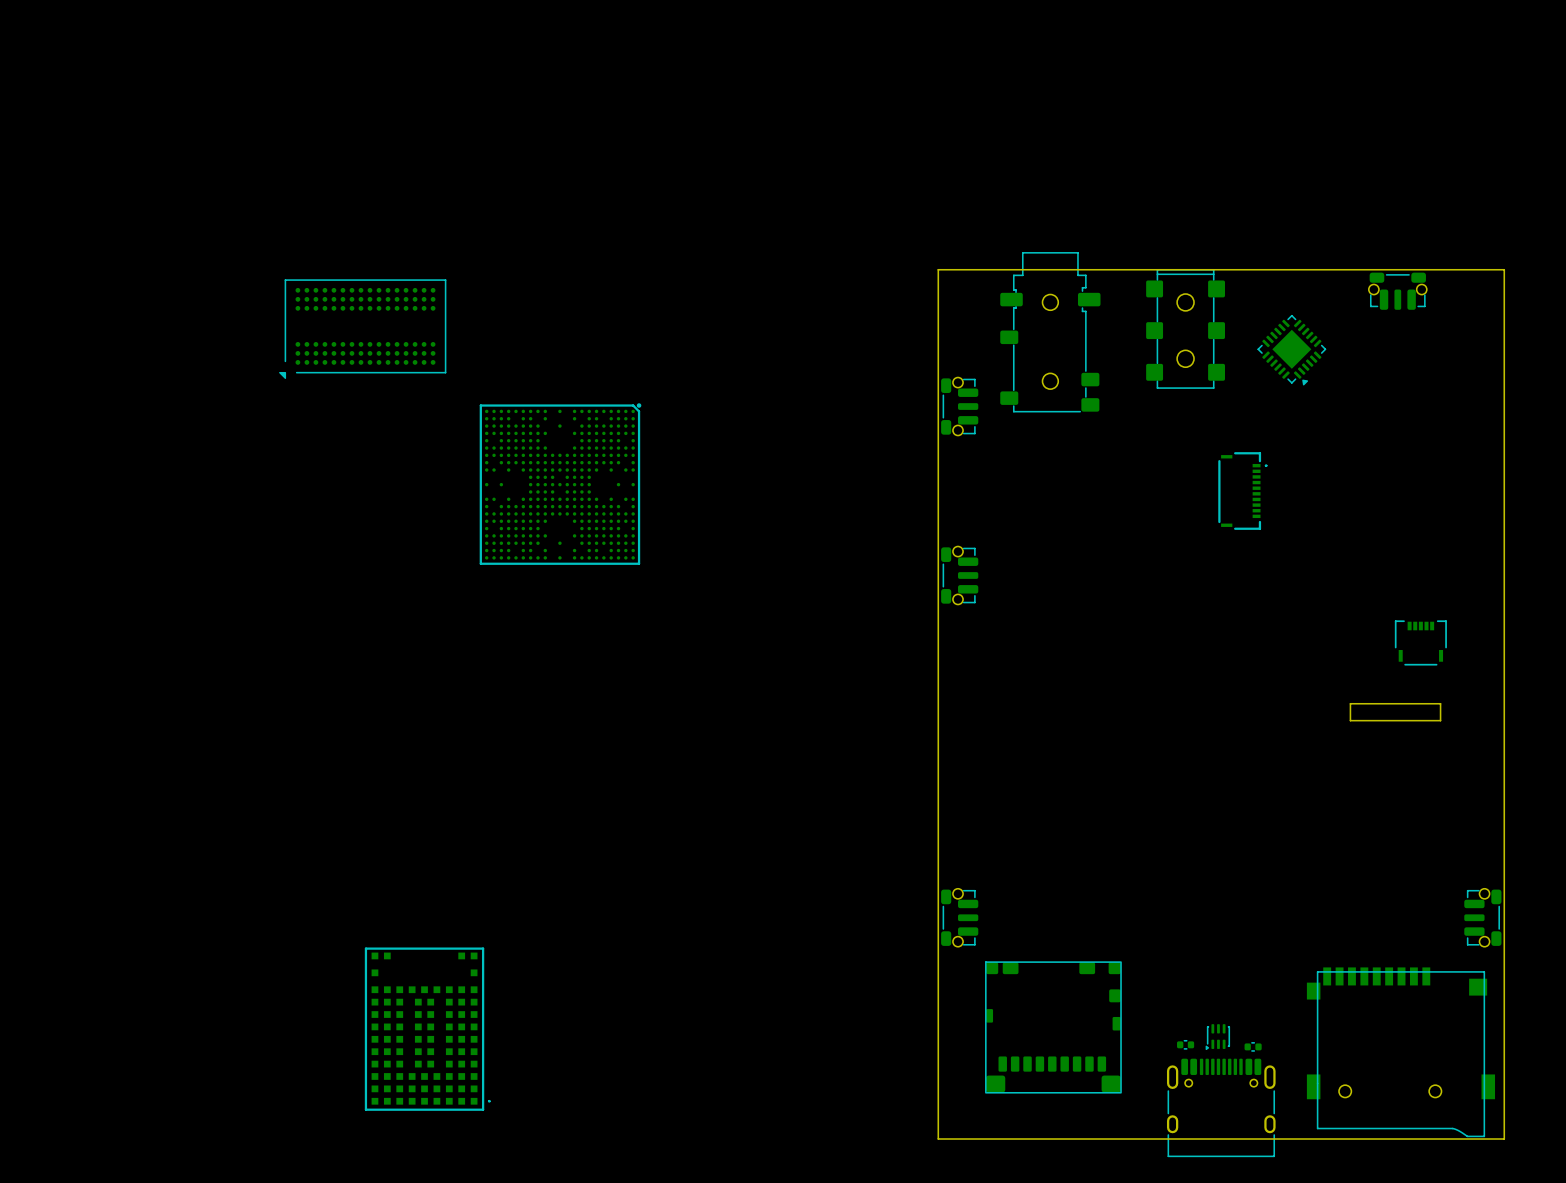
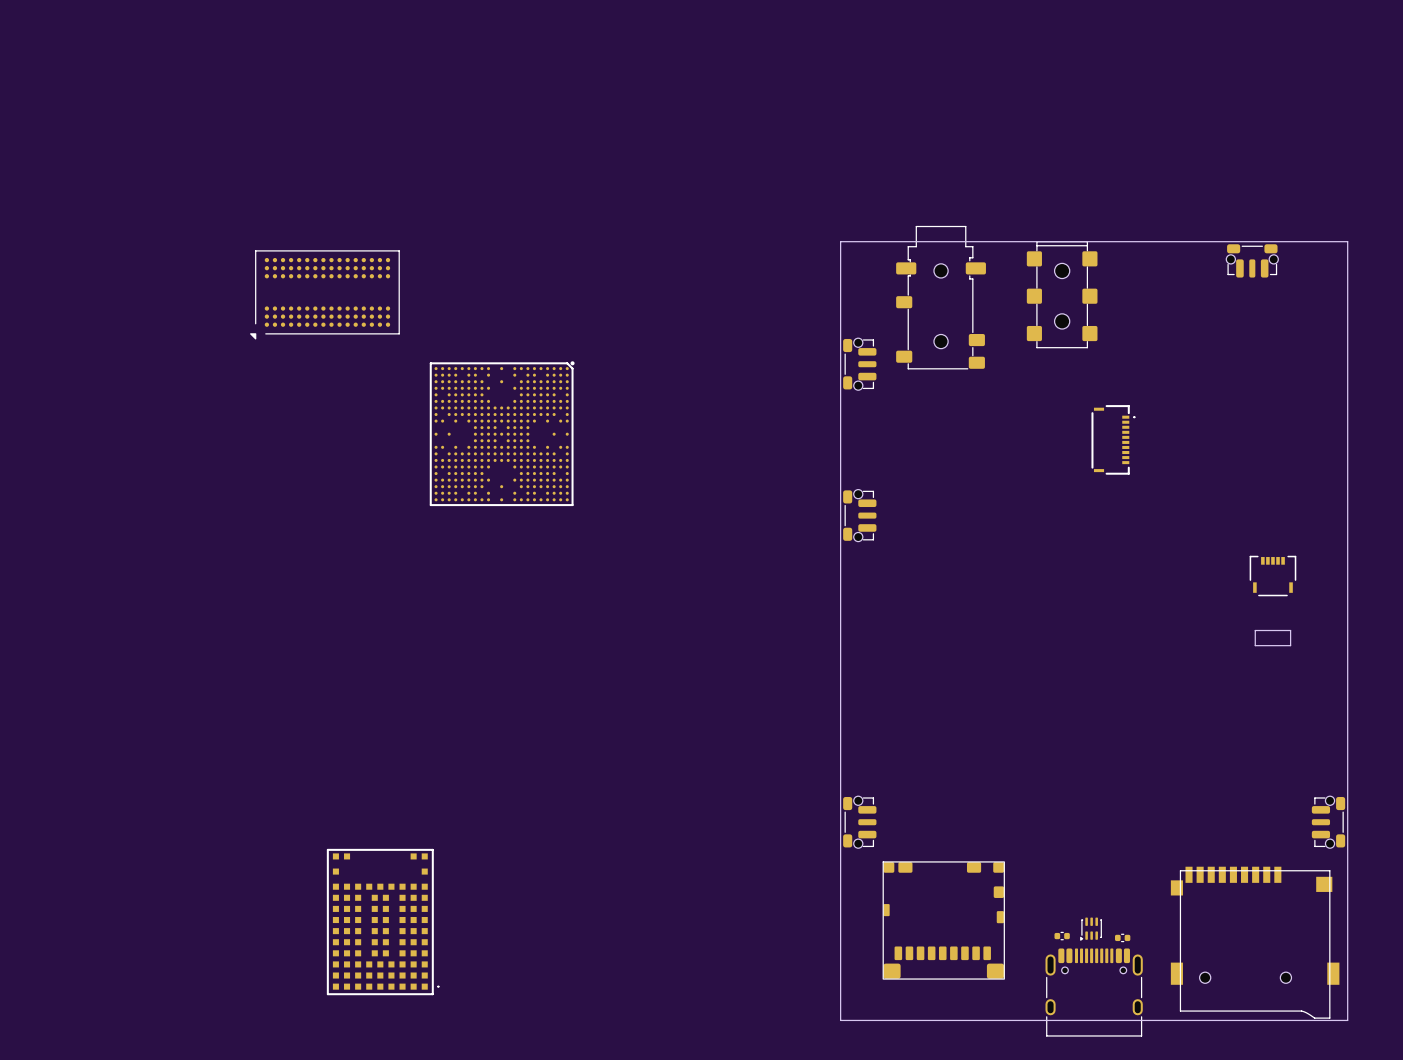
part: (1291, 350) -> none
board edge: (1401, 703) (1350, 703) (1350, 720) (1401, 720) -> (1255, 630) (1255, 645)

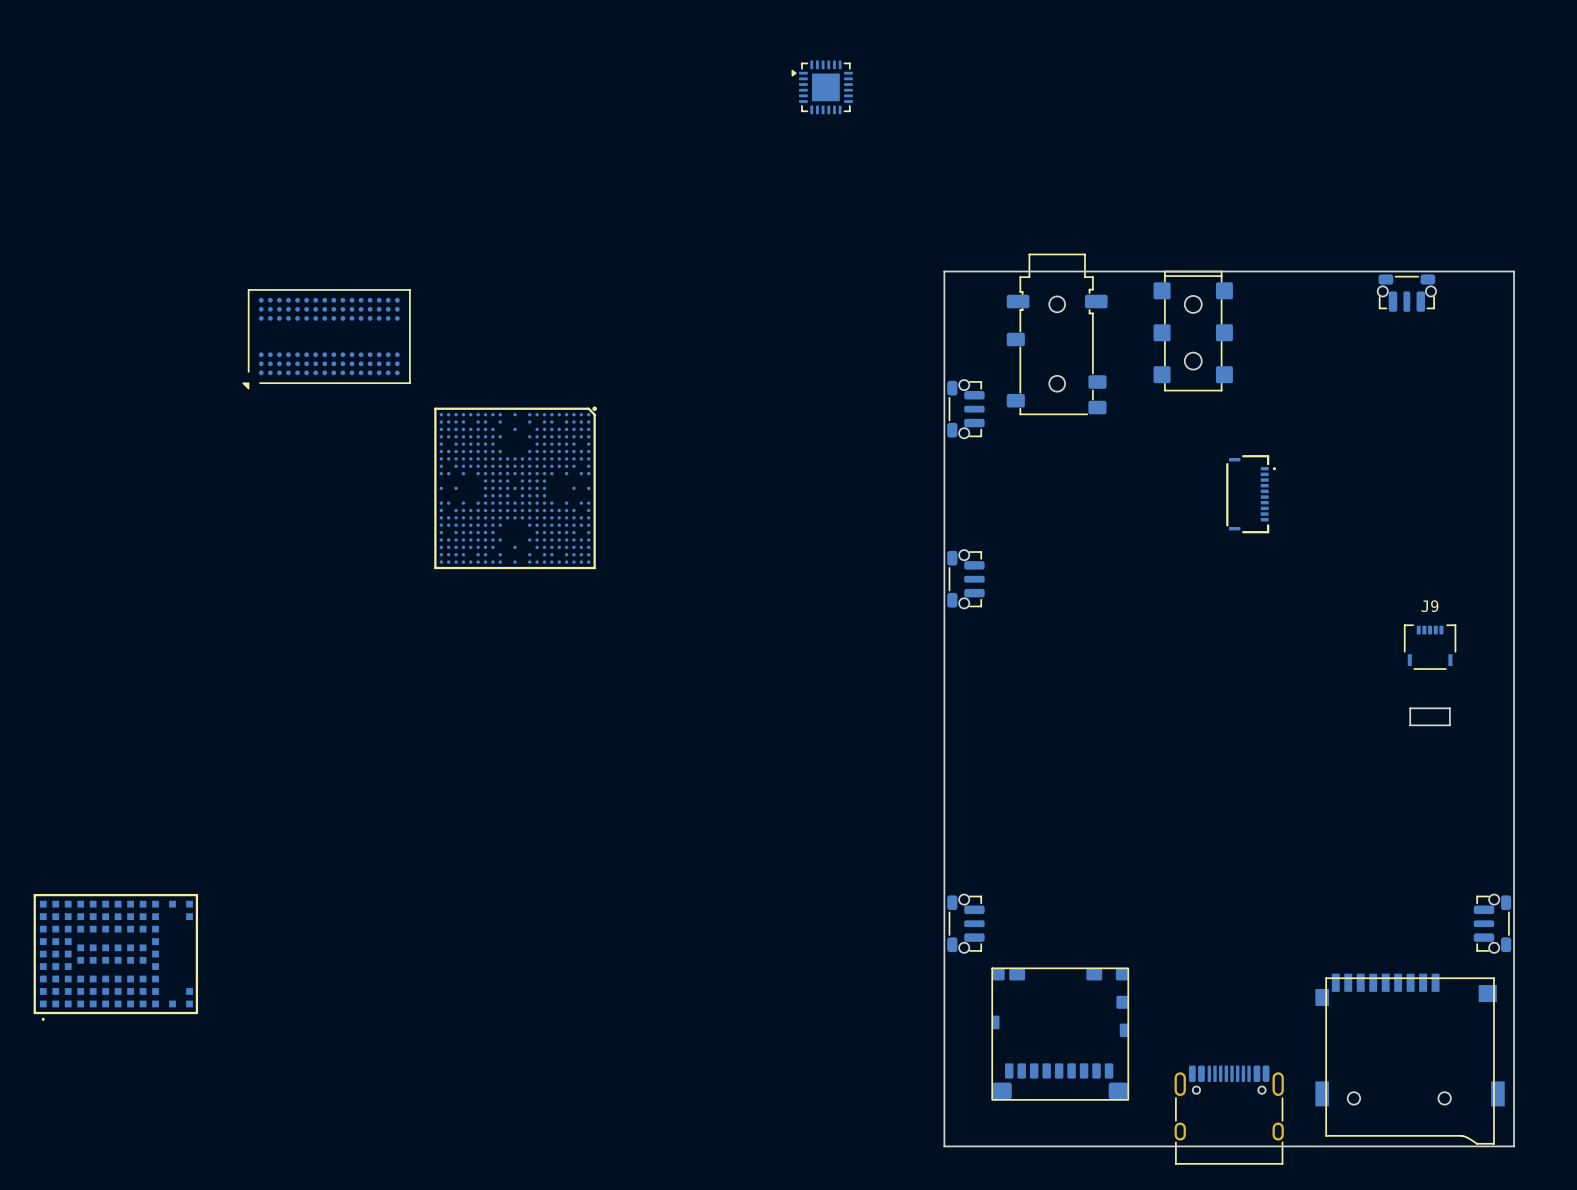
part: none -> (822, 87)
part position: (324, 294) -> (326, 339)
part position: (502, 433) -> (515, 487)
J9 name: none -> J9 (1429, 606)
part: none -> (115, 957)
part: (383, 922) -> none
part: (1091, 929) -> none
part: (1062, 936) -> none
part: (1122, 937) -> none

